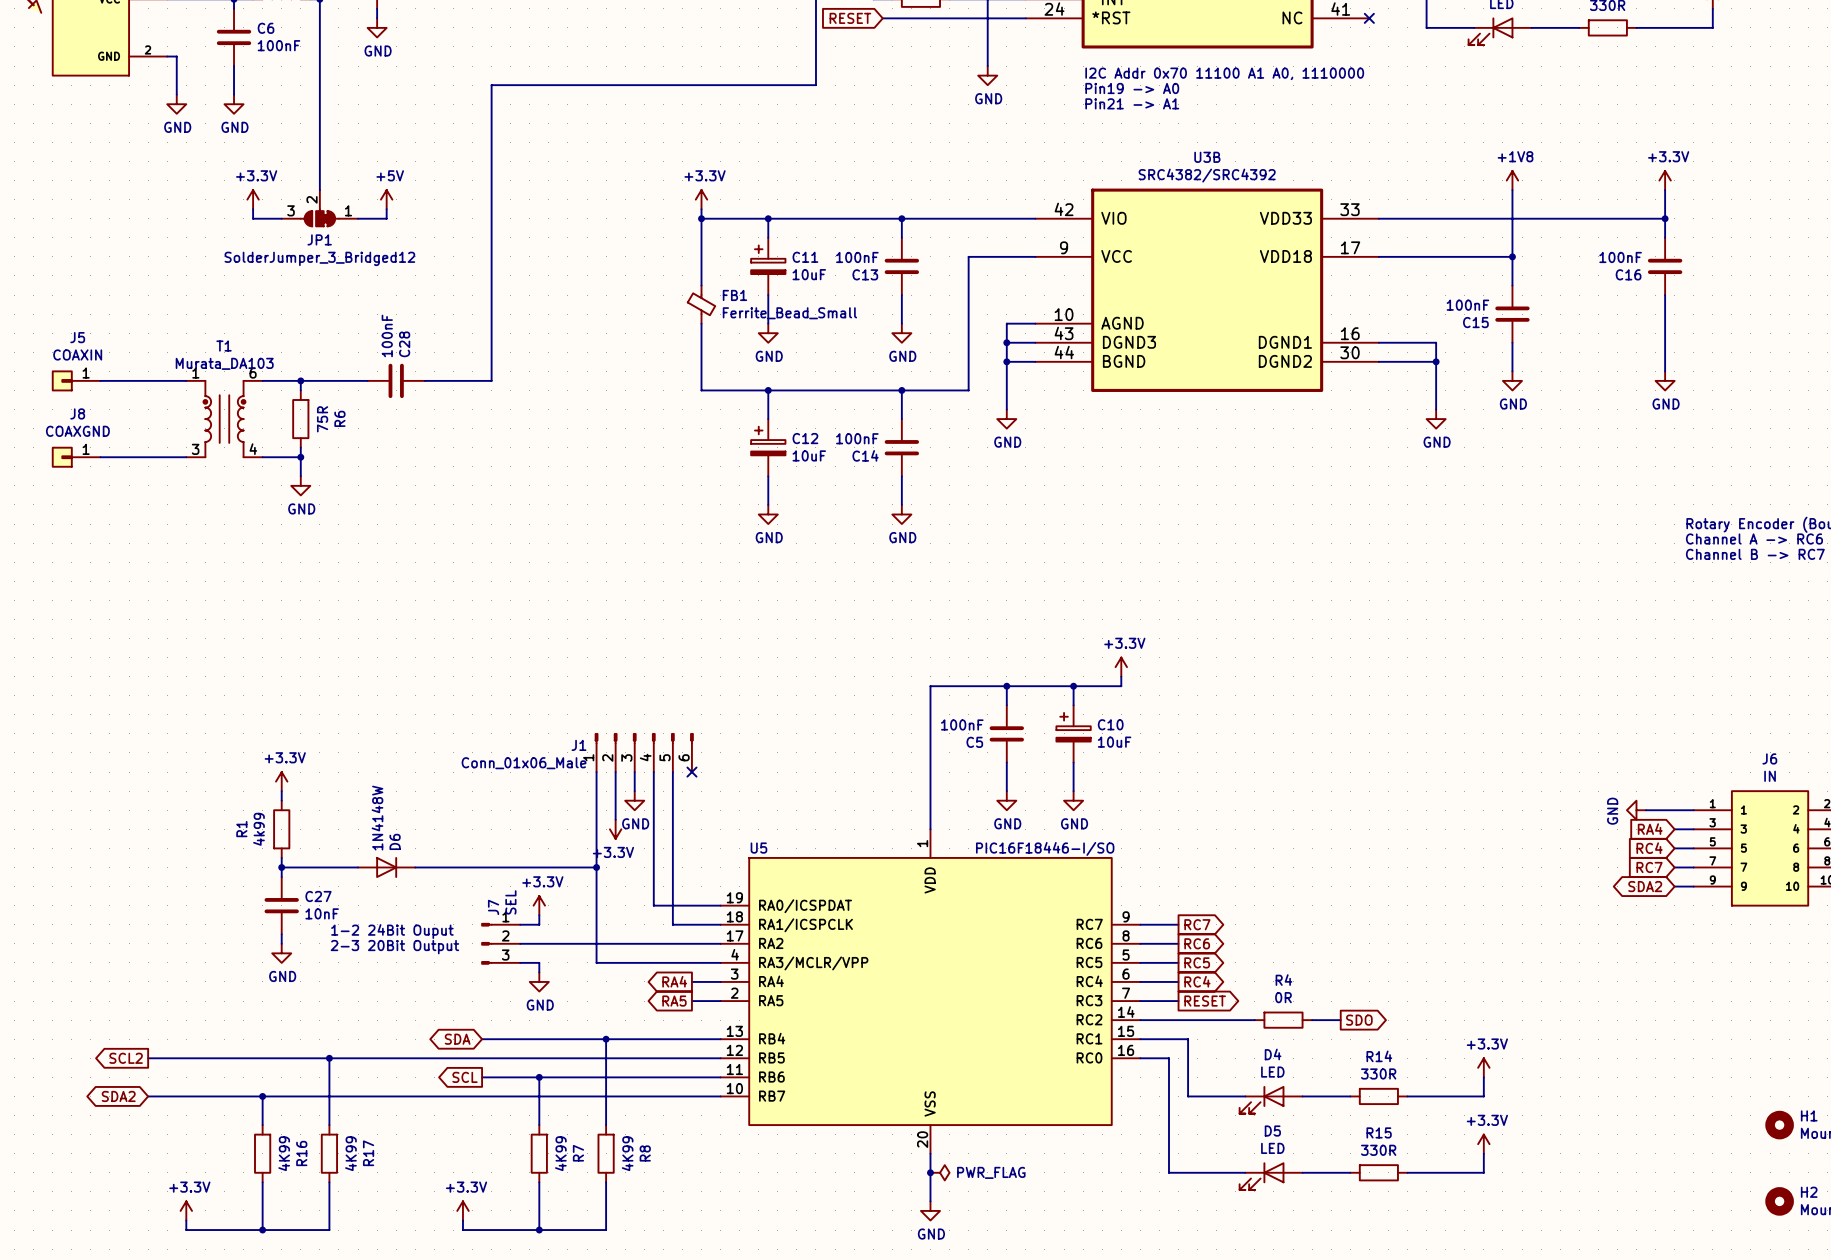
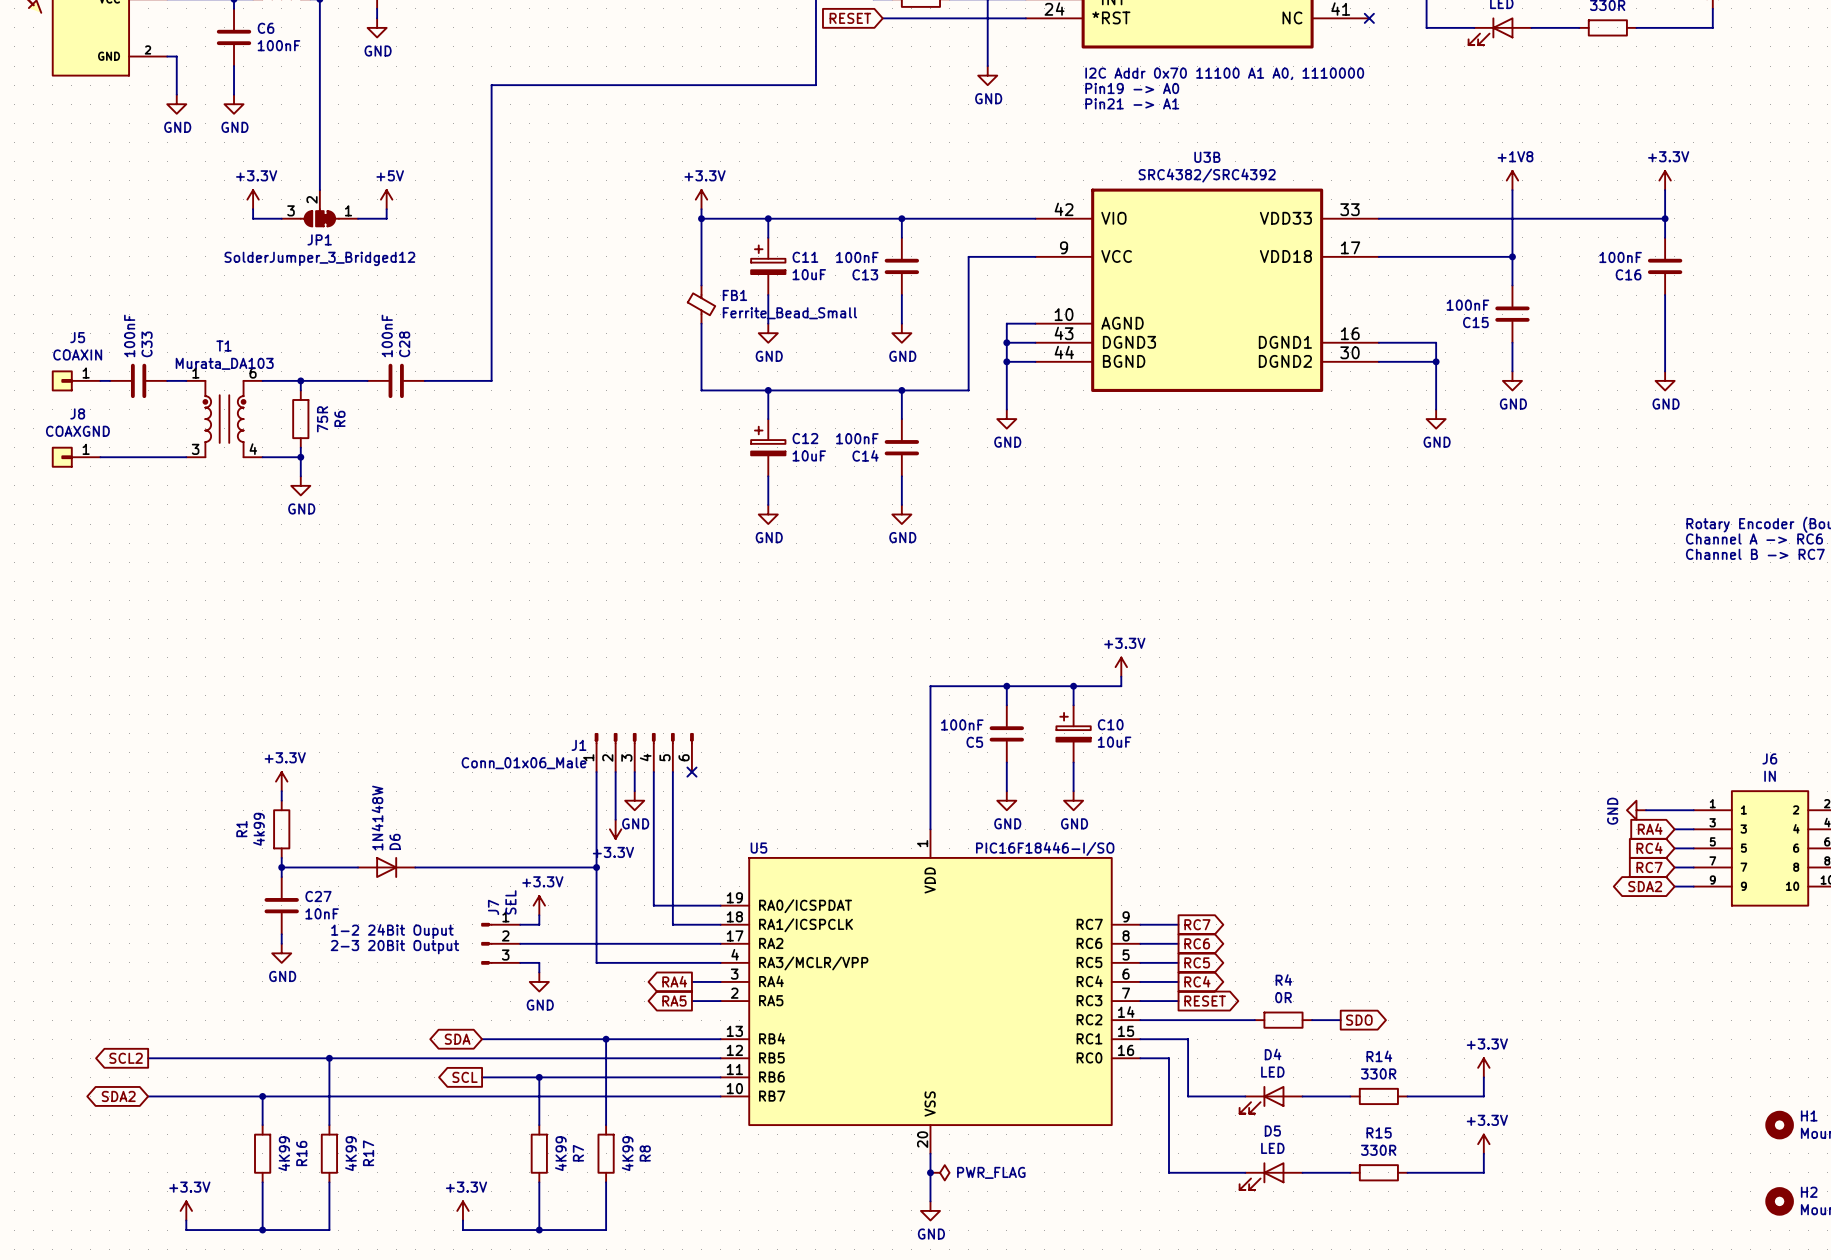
C33: none -> 100nF (138, 380)

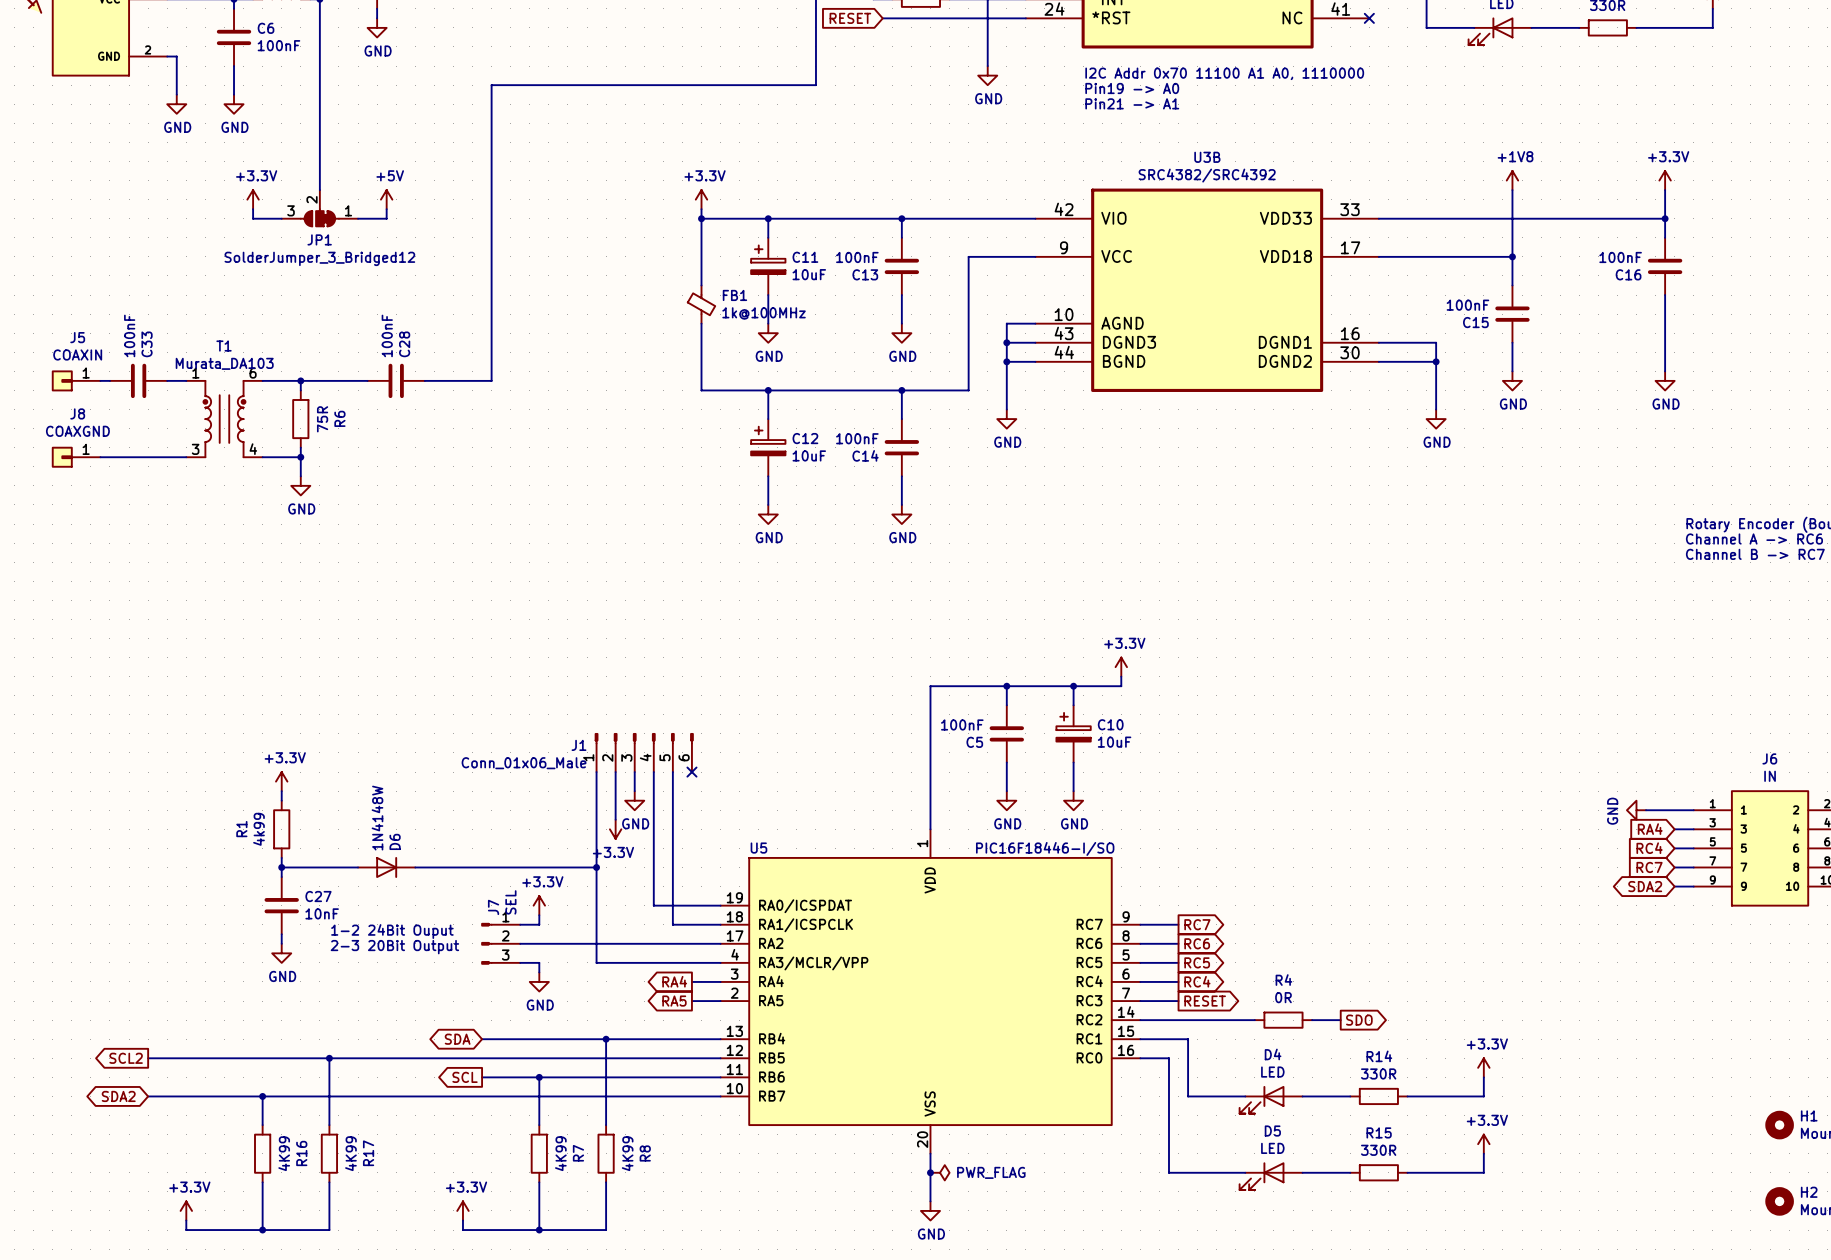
FB1 value: Ferrite_Bead_Small (789, 313) -> 1k@100MHz (764, 313)

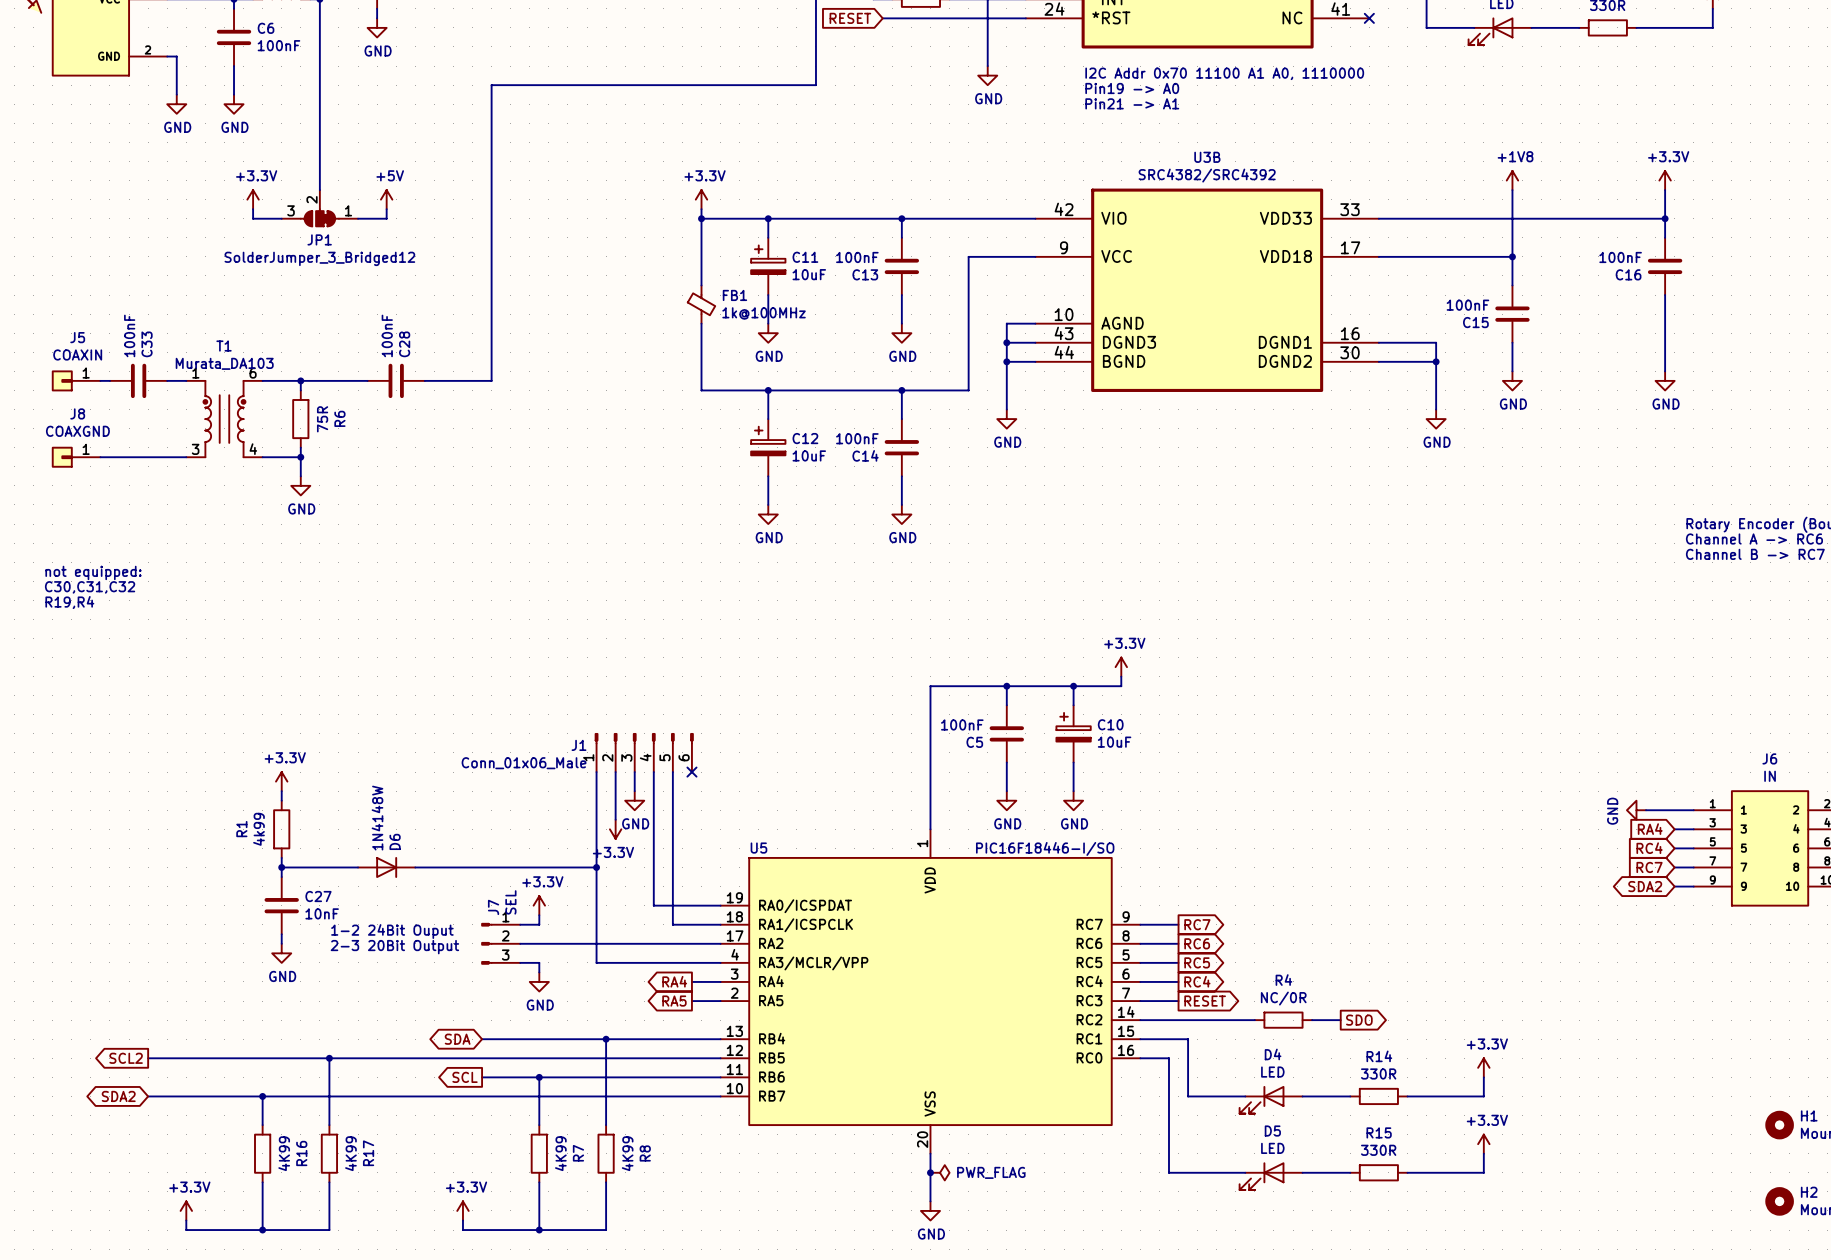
text: none -> not equipped: (93, 572)
text: none -> C30,C31,C32 (90, 587)
text: none -> R19,R4 (69, 602)
R4 value: 0R (1283, 997) -> NC/0R (1283, 998)

